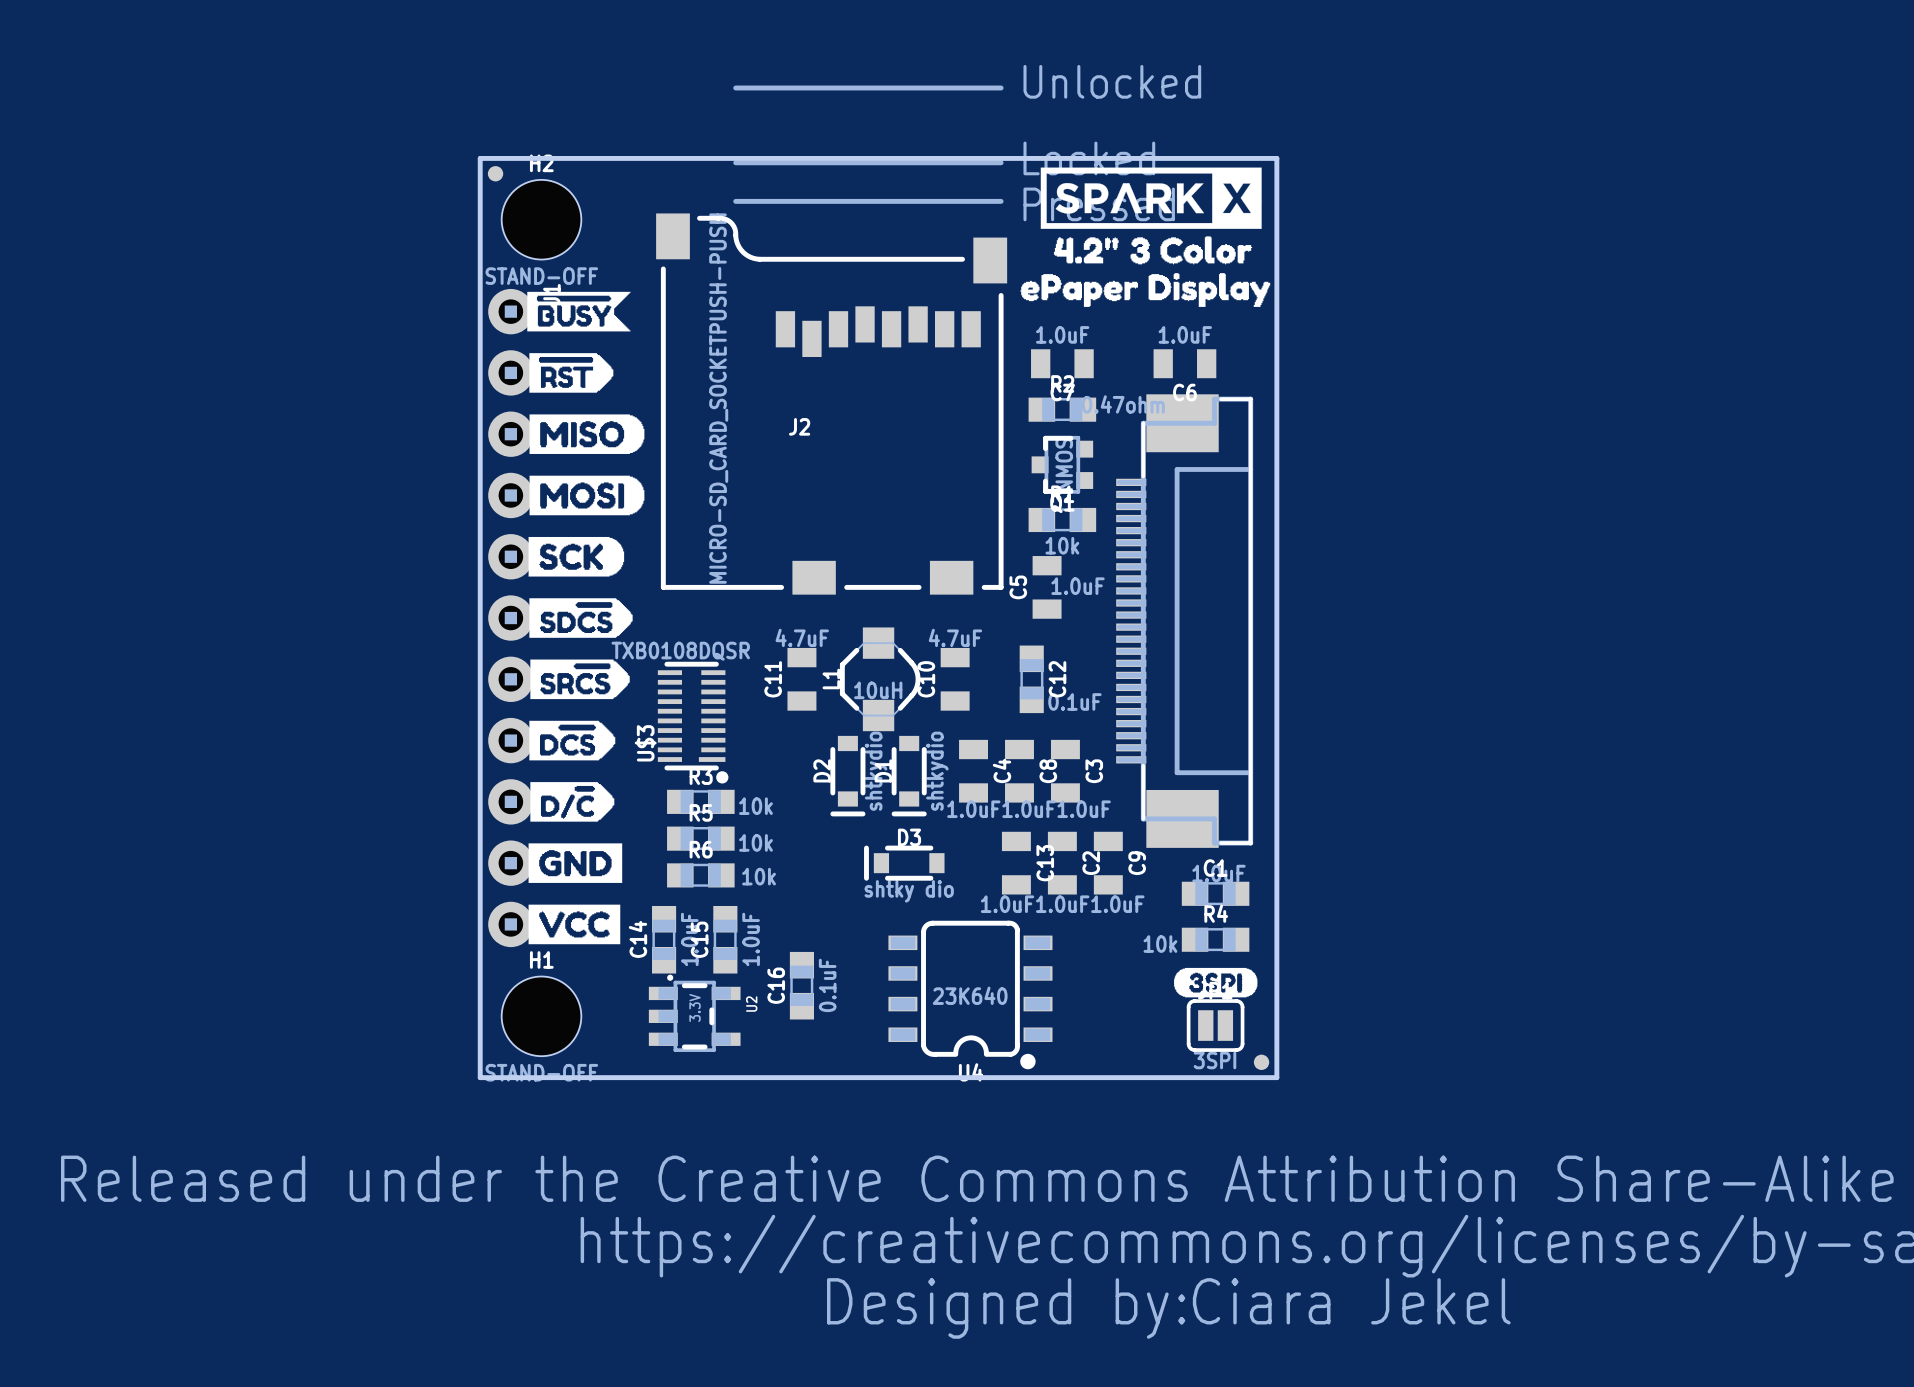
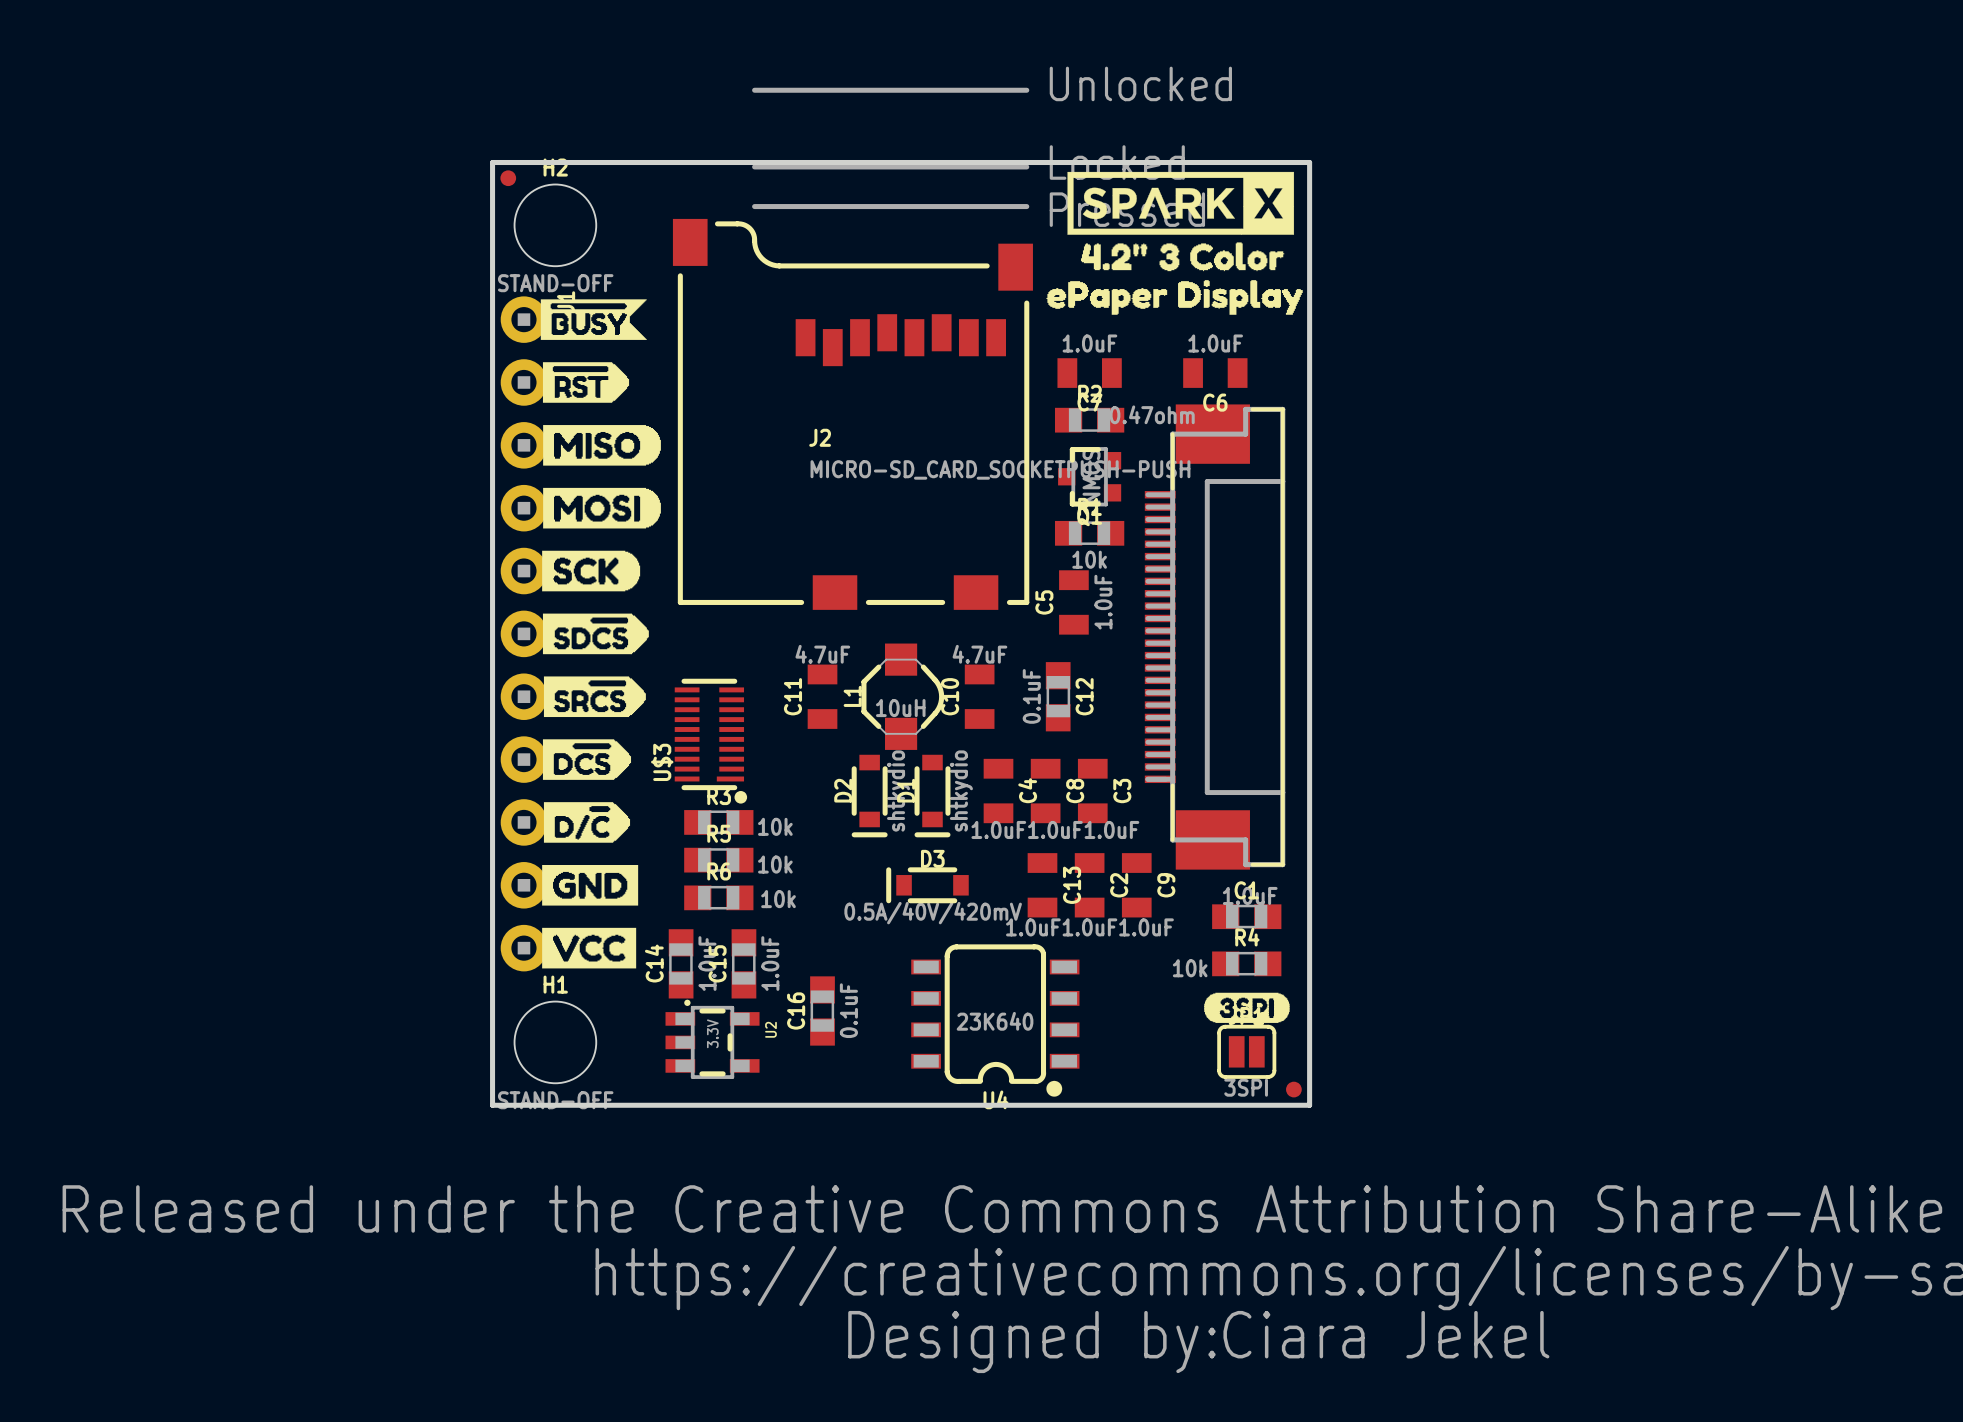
J2 value rotation: 0° (718, 398) -> 90° clockwise (1000, 469)
C5 value rotation: 0° (1078, 586) -> 90° counterclockwise (1103, 602)
U$3 value: TXB0108DQSR (680, 651) -> none
C12 value rotation: 0° (1074, 701) -> 90° counterclockwise (1031, 696)
C12 value position: 0.1uF (1074, 701) -> 0.1uF (1031, 696)
D3 value: shtky dio (909, 891) -> 0.5A/40V/420mV (933, 913)

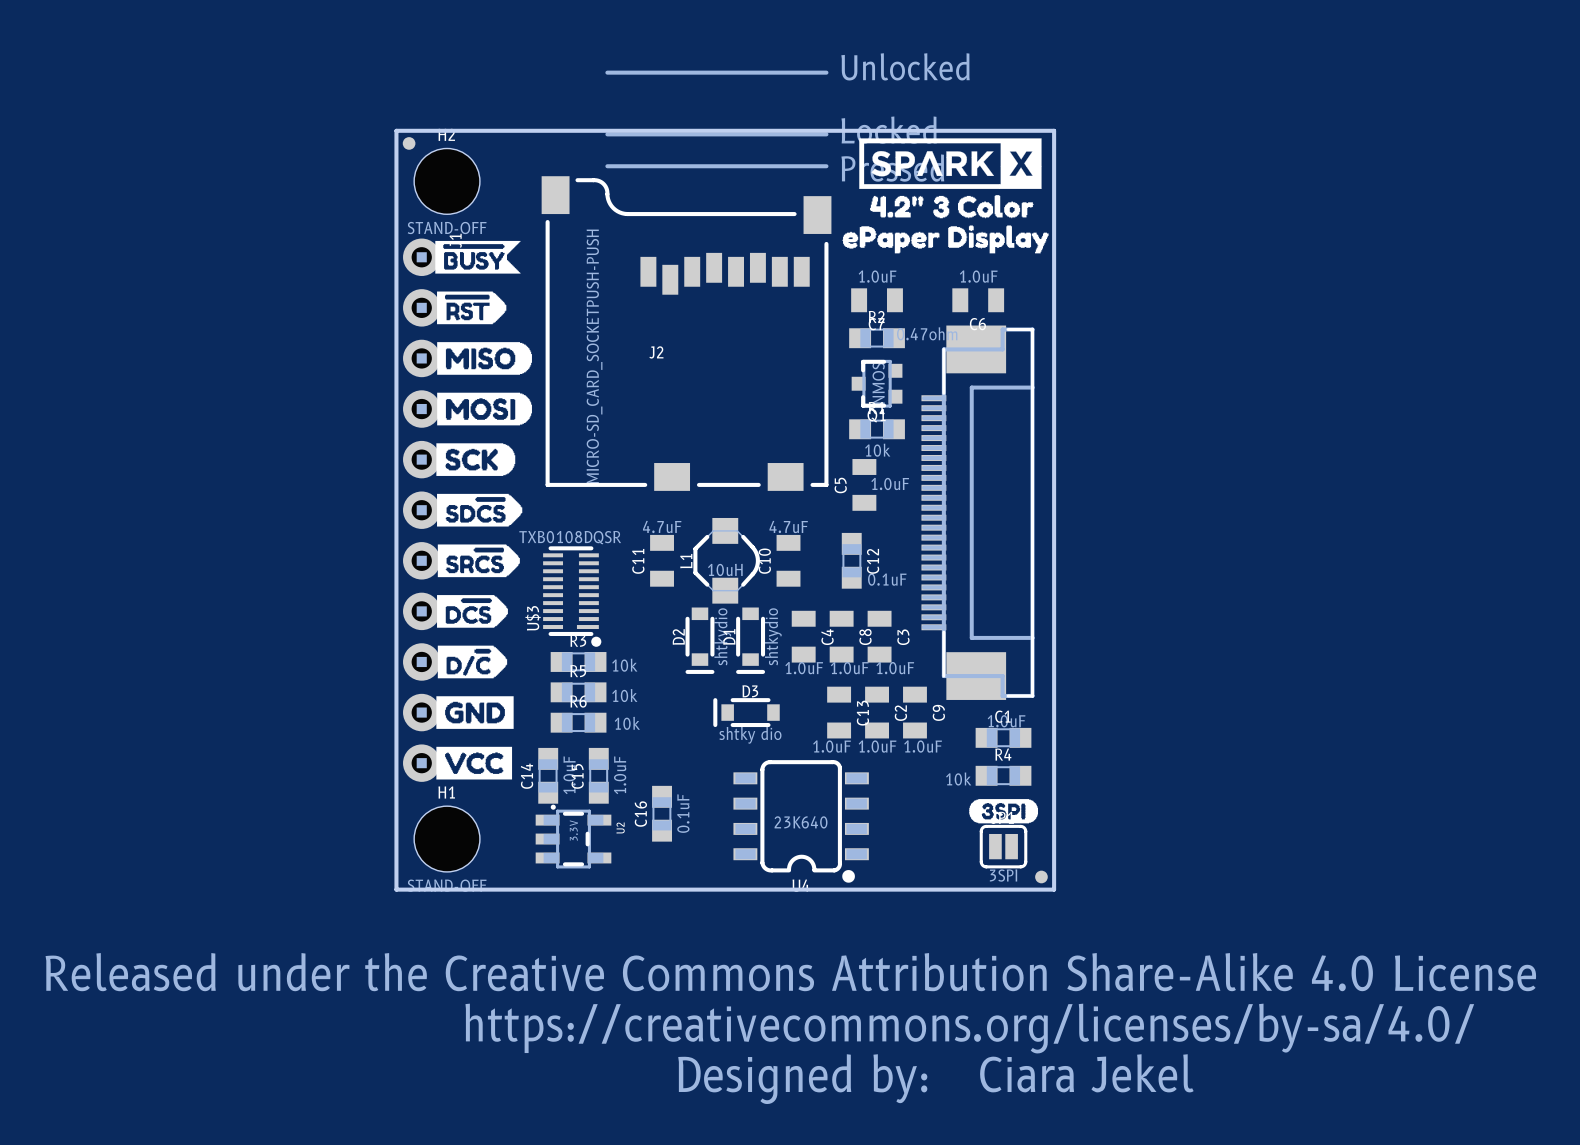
J2 value rotation: 0° (1000, 469) -> 90° counterclockwise (594, 356)
C5 value rotation: 0° (1103, 602) -> 90° clockwise (890, 483)
U$3 value: none -> TXB0108DQSR (570, 537)
C12 value rotation: 0° (1031, 696) -> 90° clockwise (887, 579)
C12 value position: 0.1uF (1031, 696) -> 0.1uF (887, 579)
D3 value: 0.5A/40V/420mV (933, 913) -> shtky dio (750, 735)

